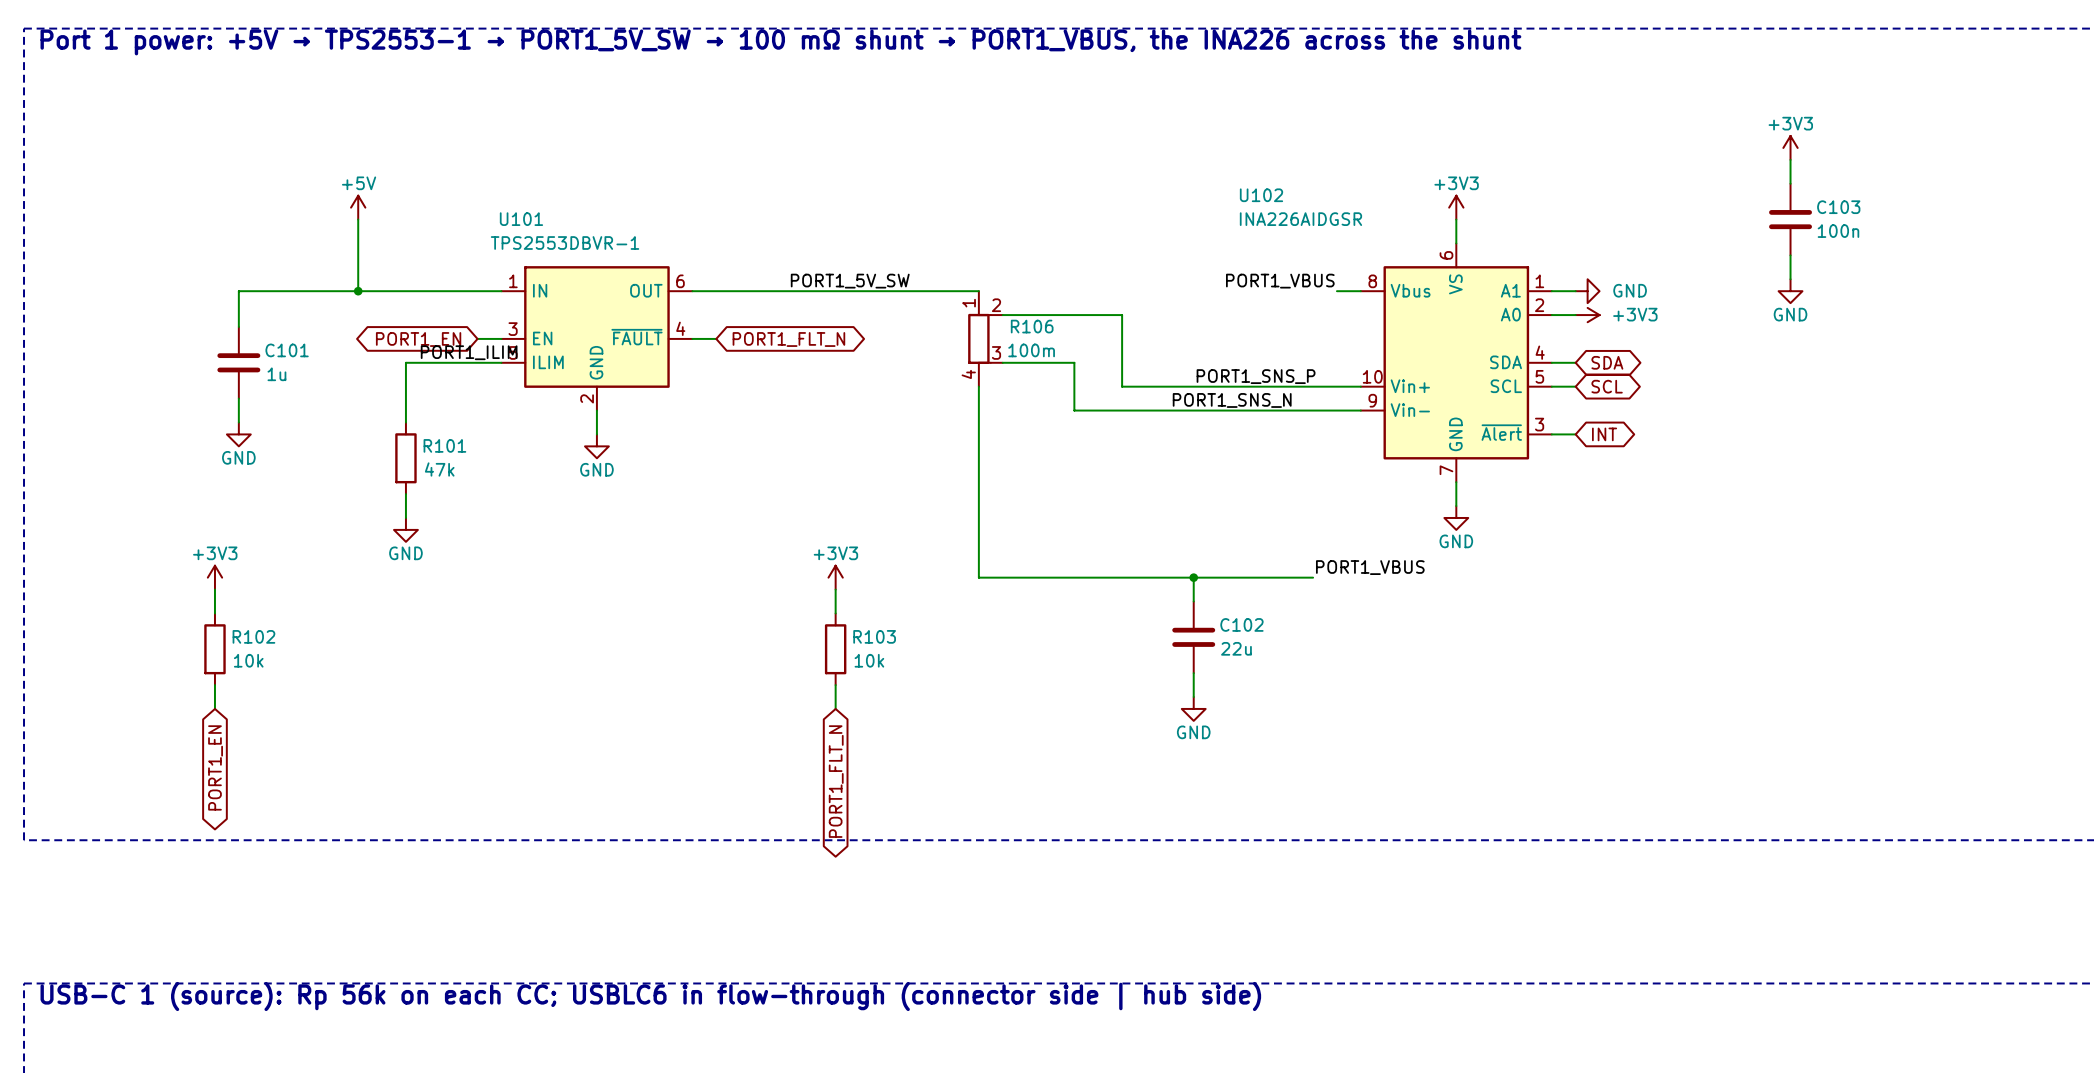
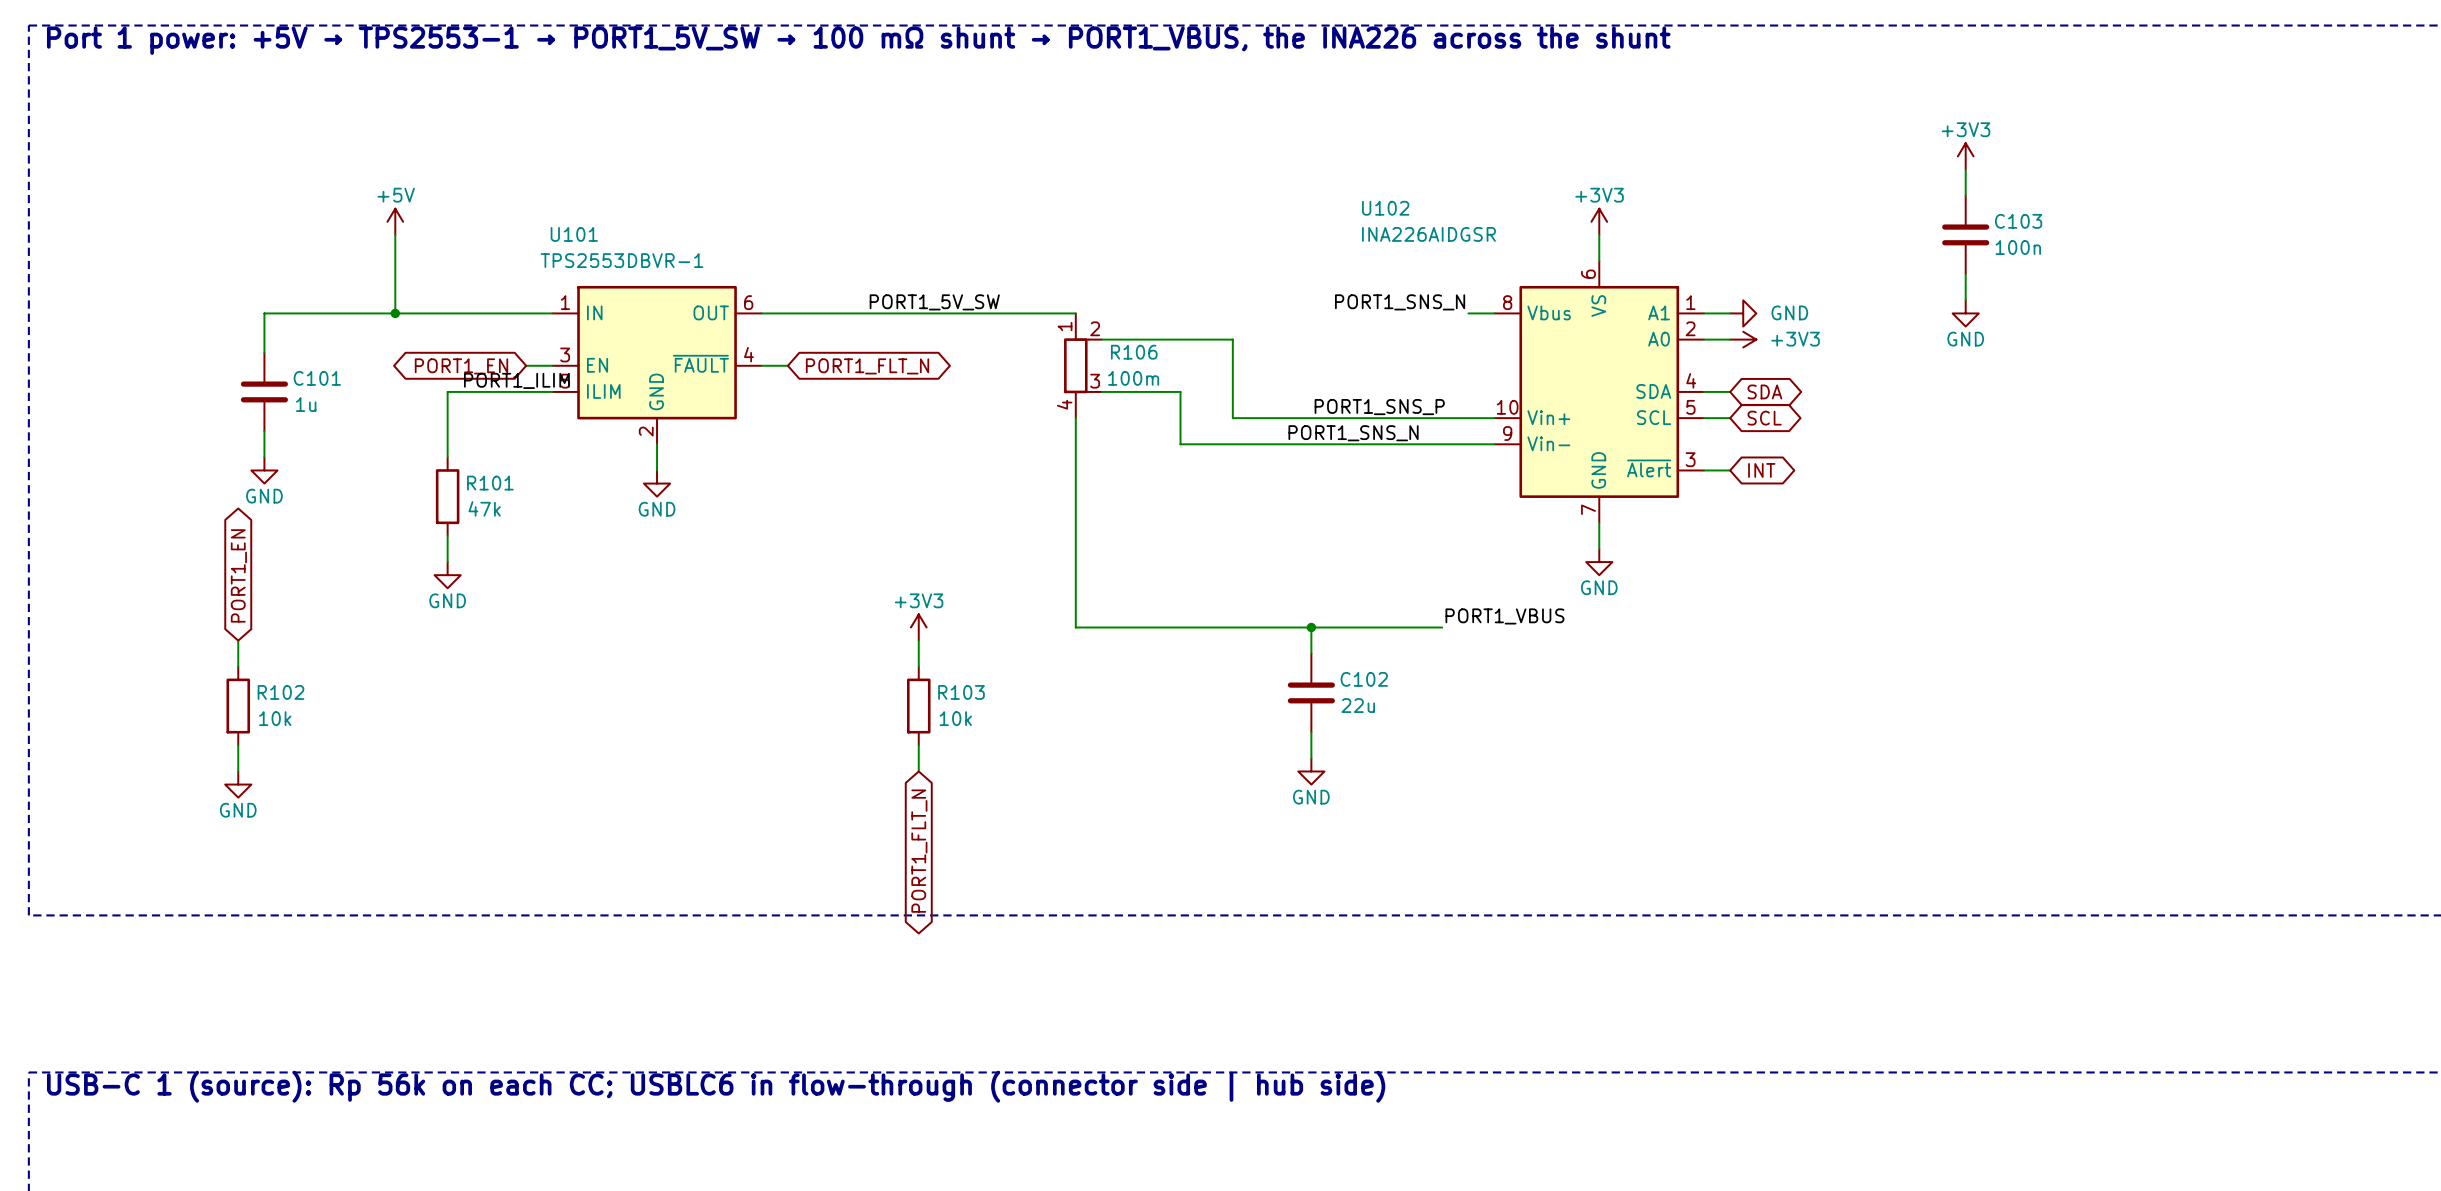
label: PORT1_VBUS (1280, 281) -> PORT1_SNS_N (1400, 302)
power symbol: +3V3 (214, 577) -> none
power symbol: none -> GND (238, 784)
global label rotation: 0° (215, 767) -> 180° (238, 575)
global label position: PORT1_EN (215, 767) -> PORT1_EN (238, 575)

